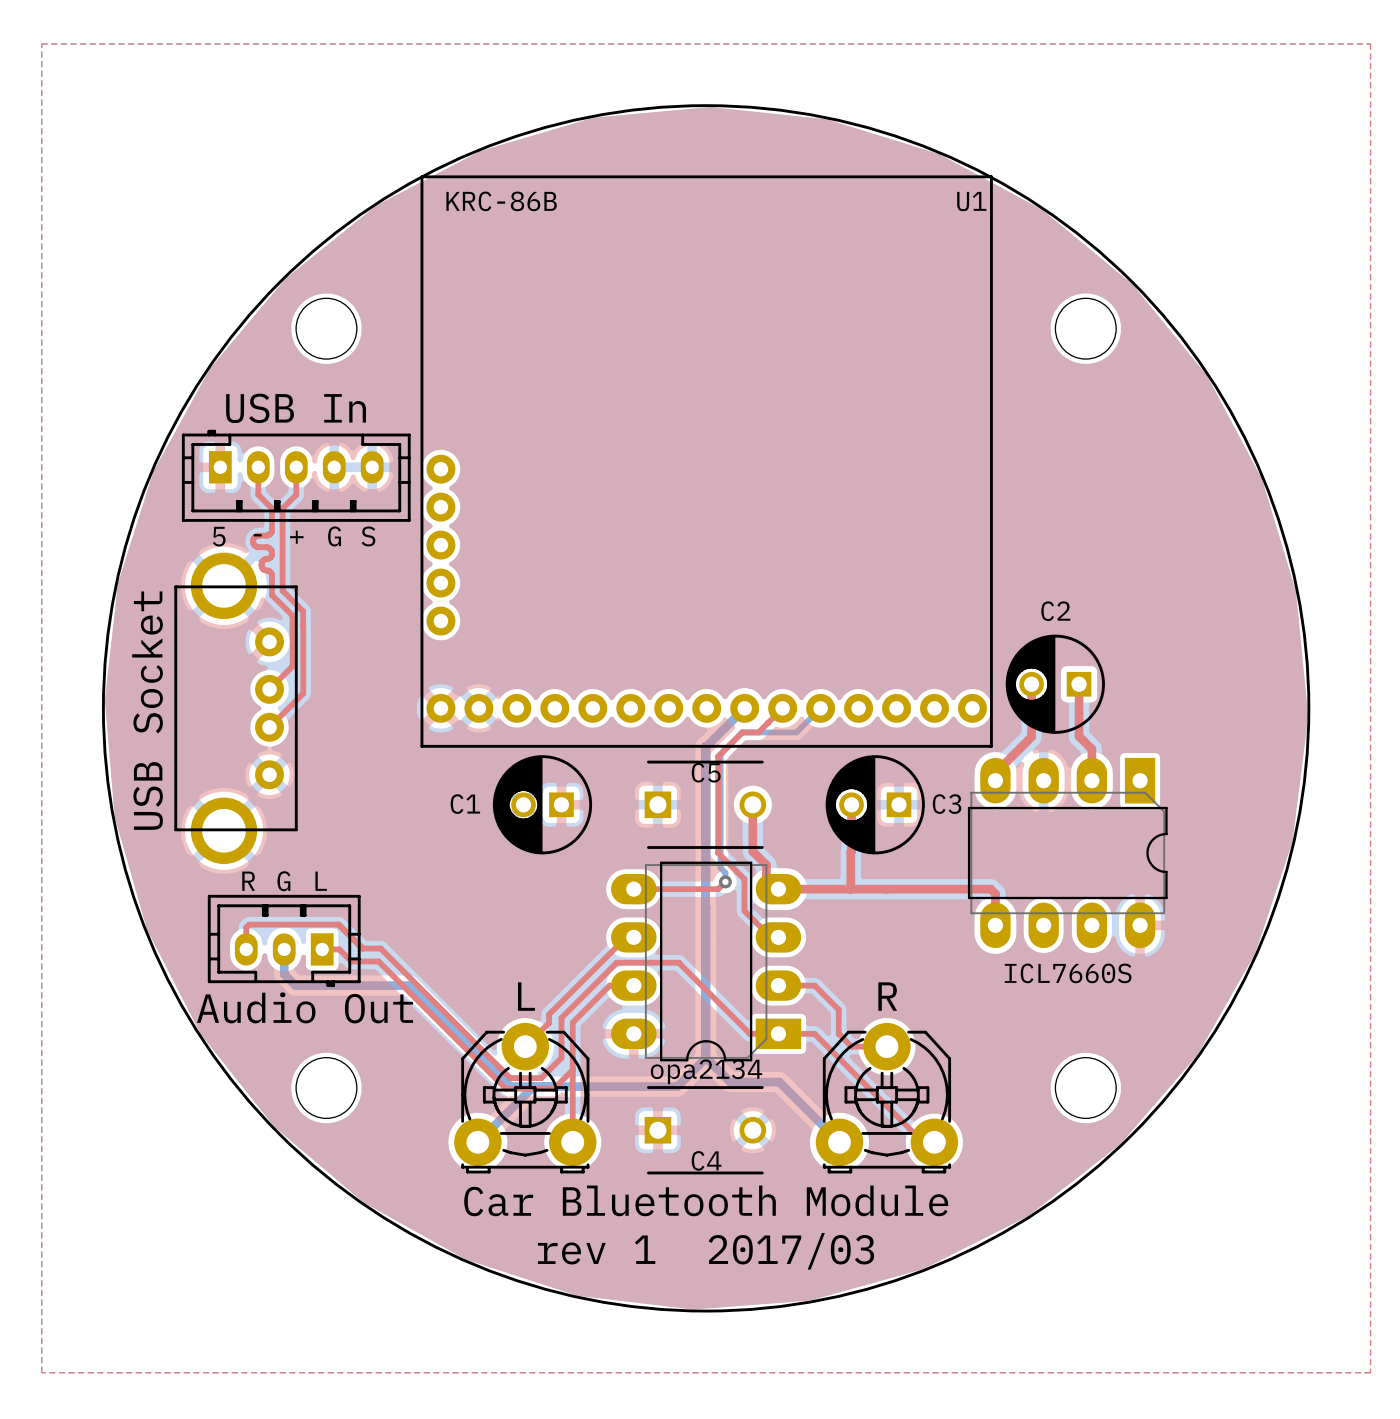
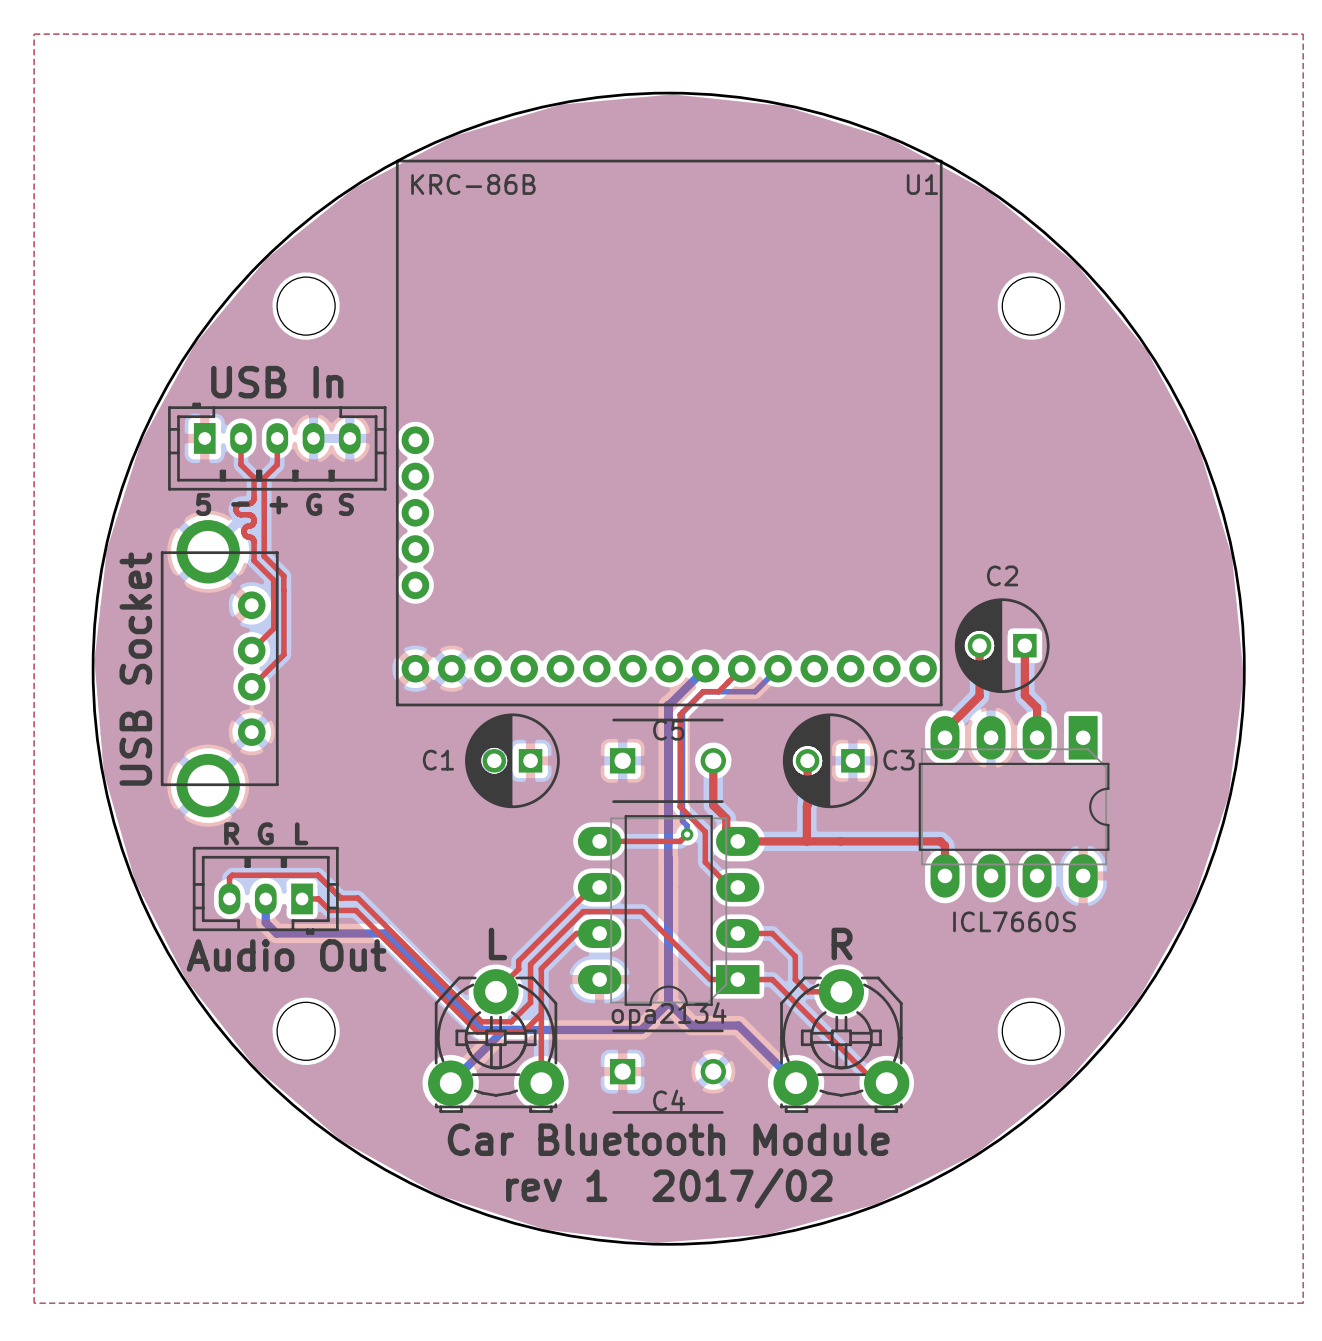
text: rev 1 2017/03 (706, 1251) -> rev 1 2017/02 (669, 1188)

